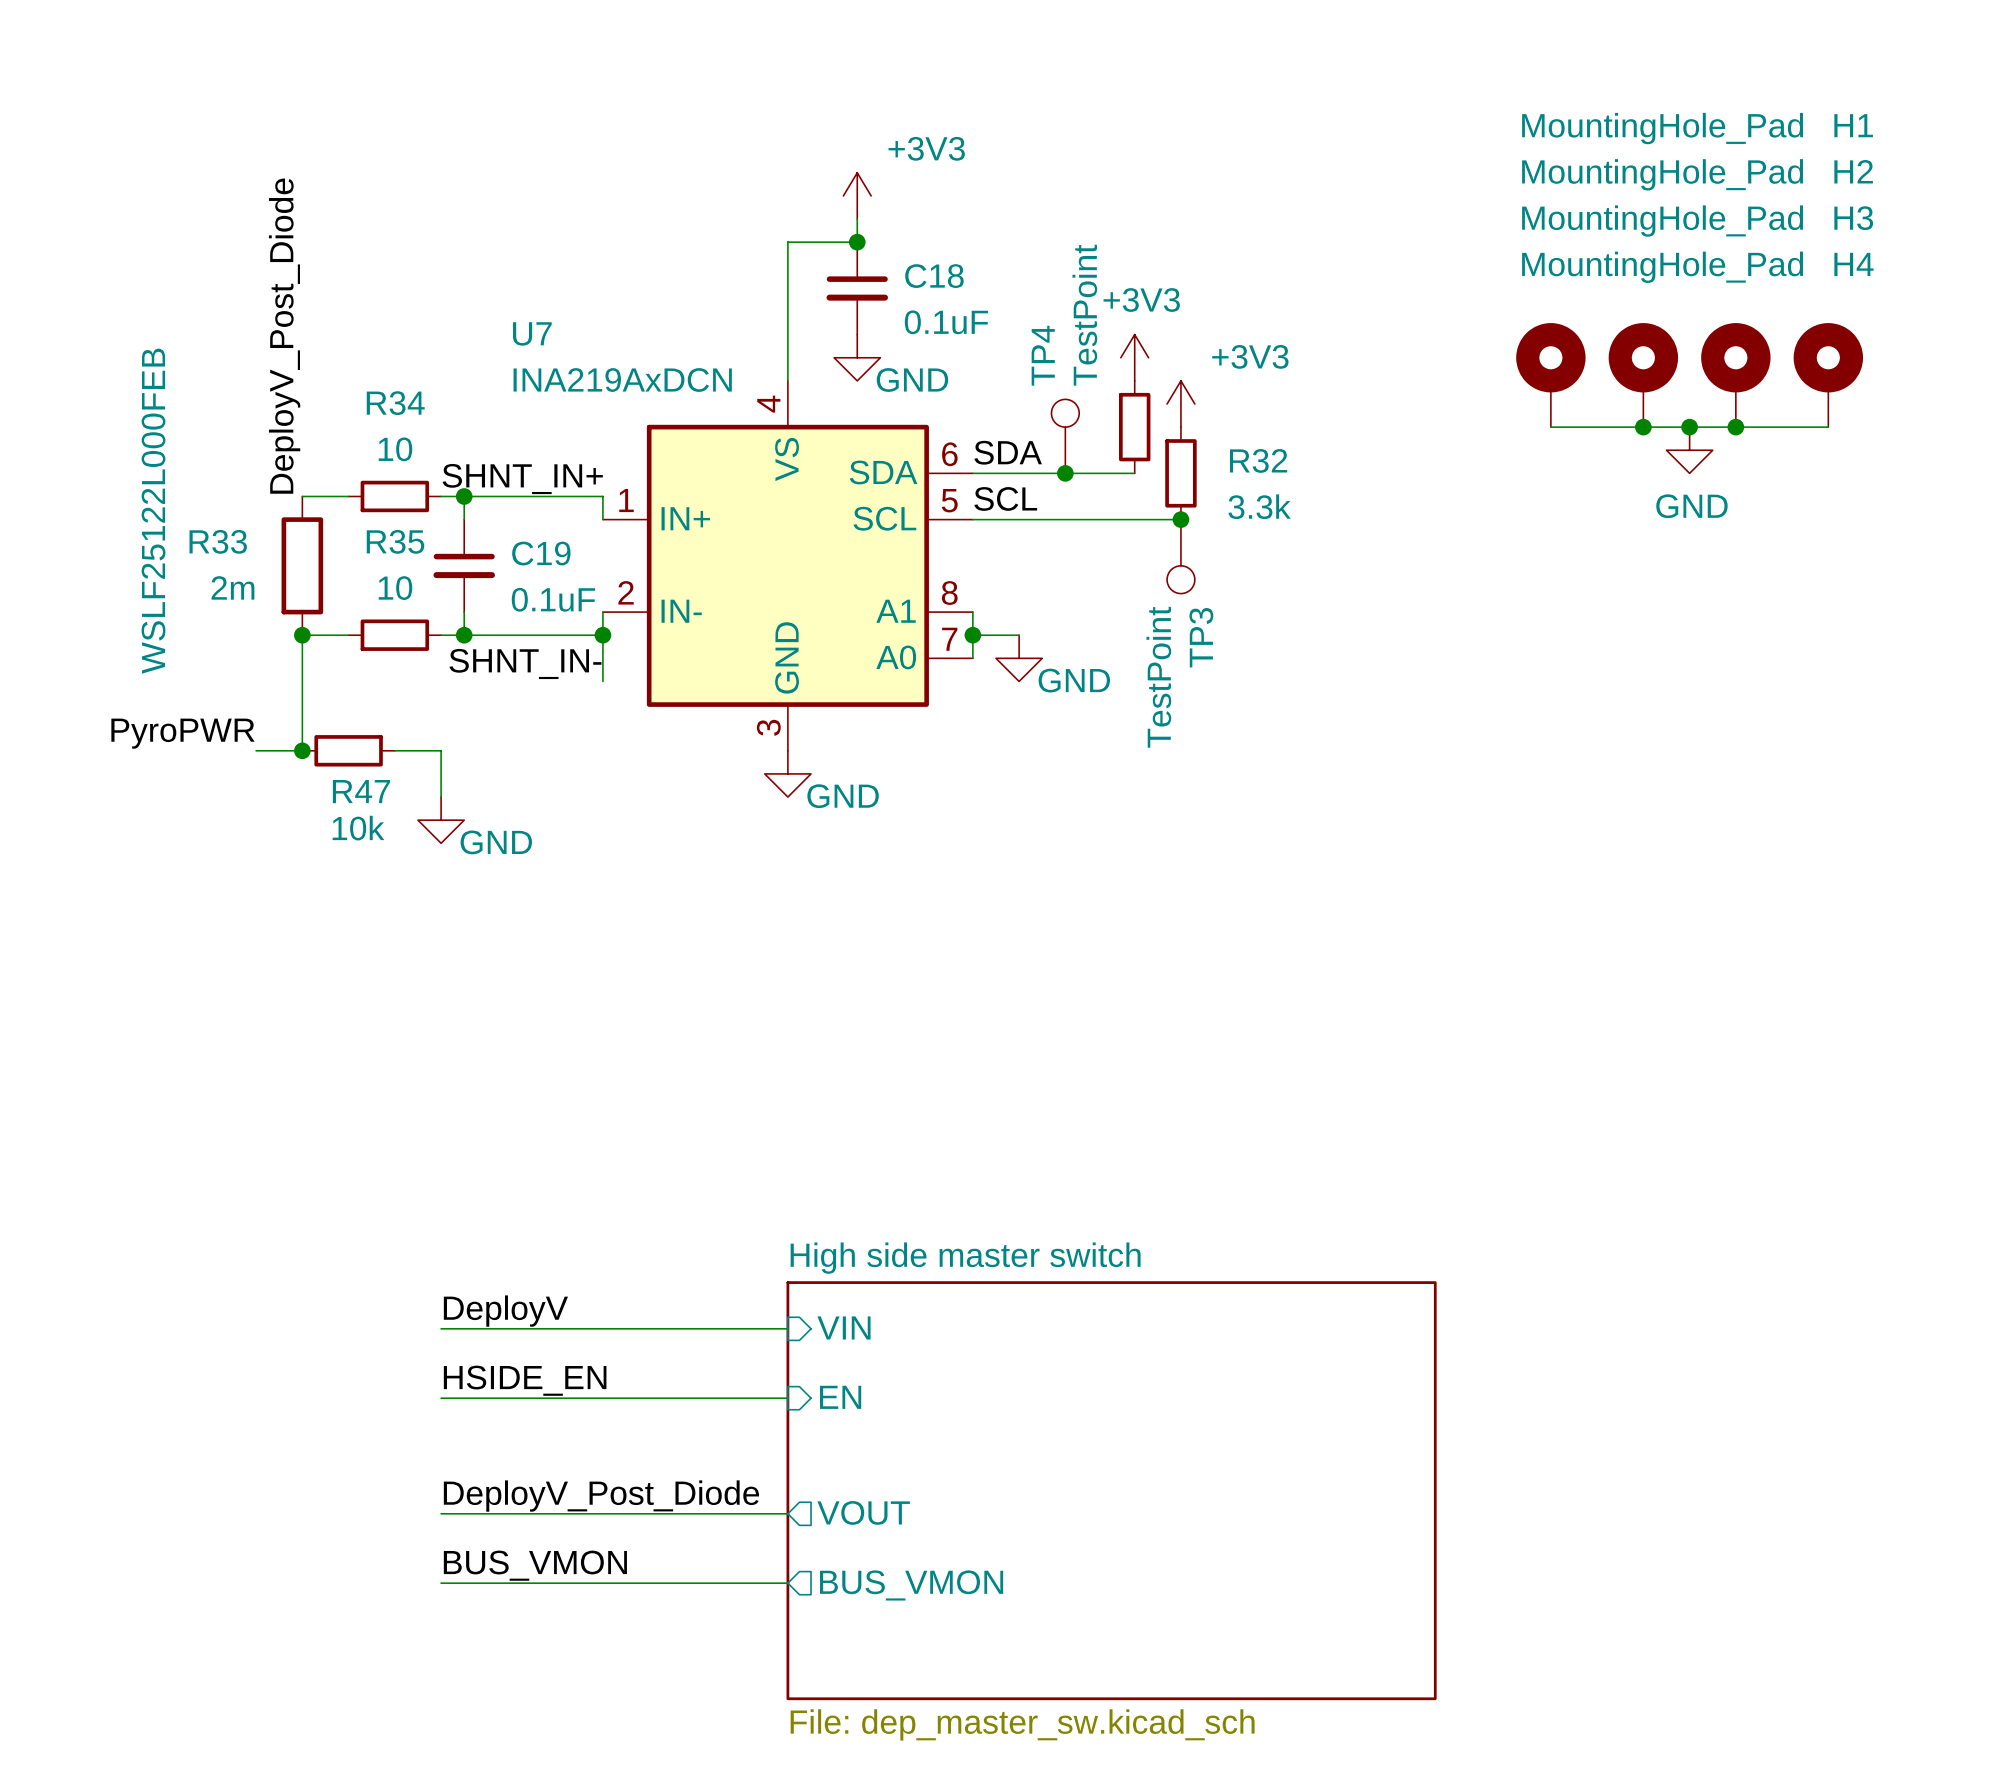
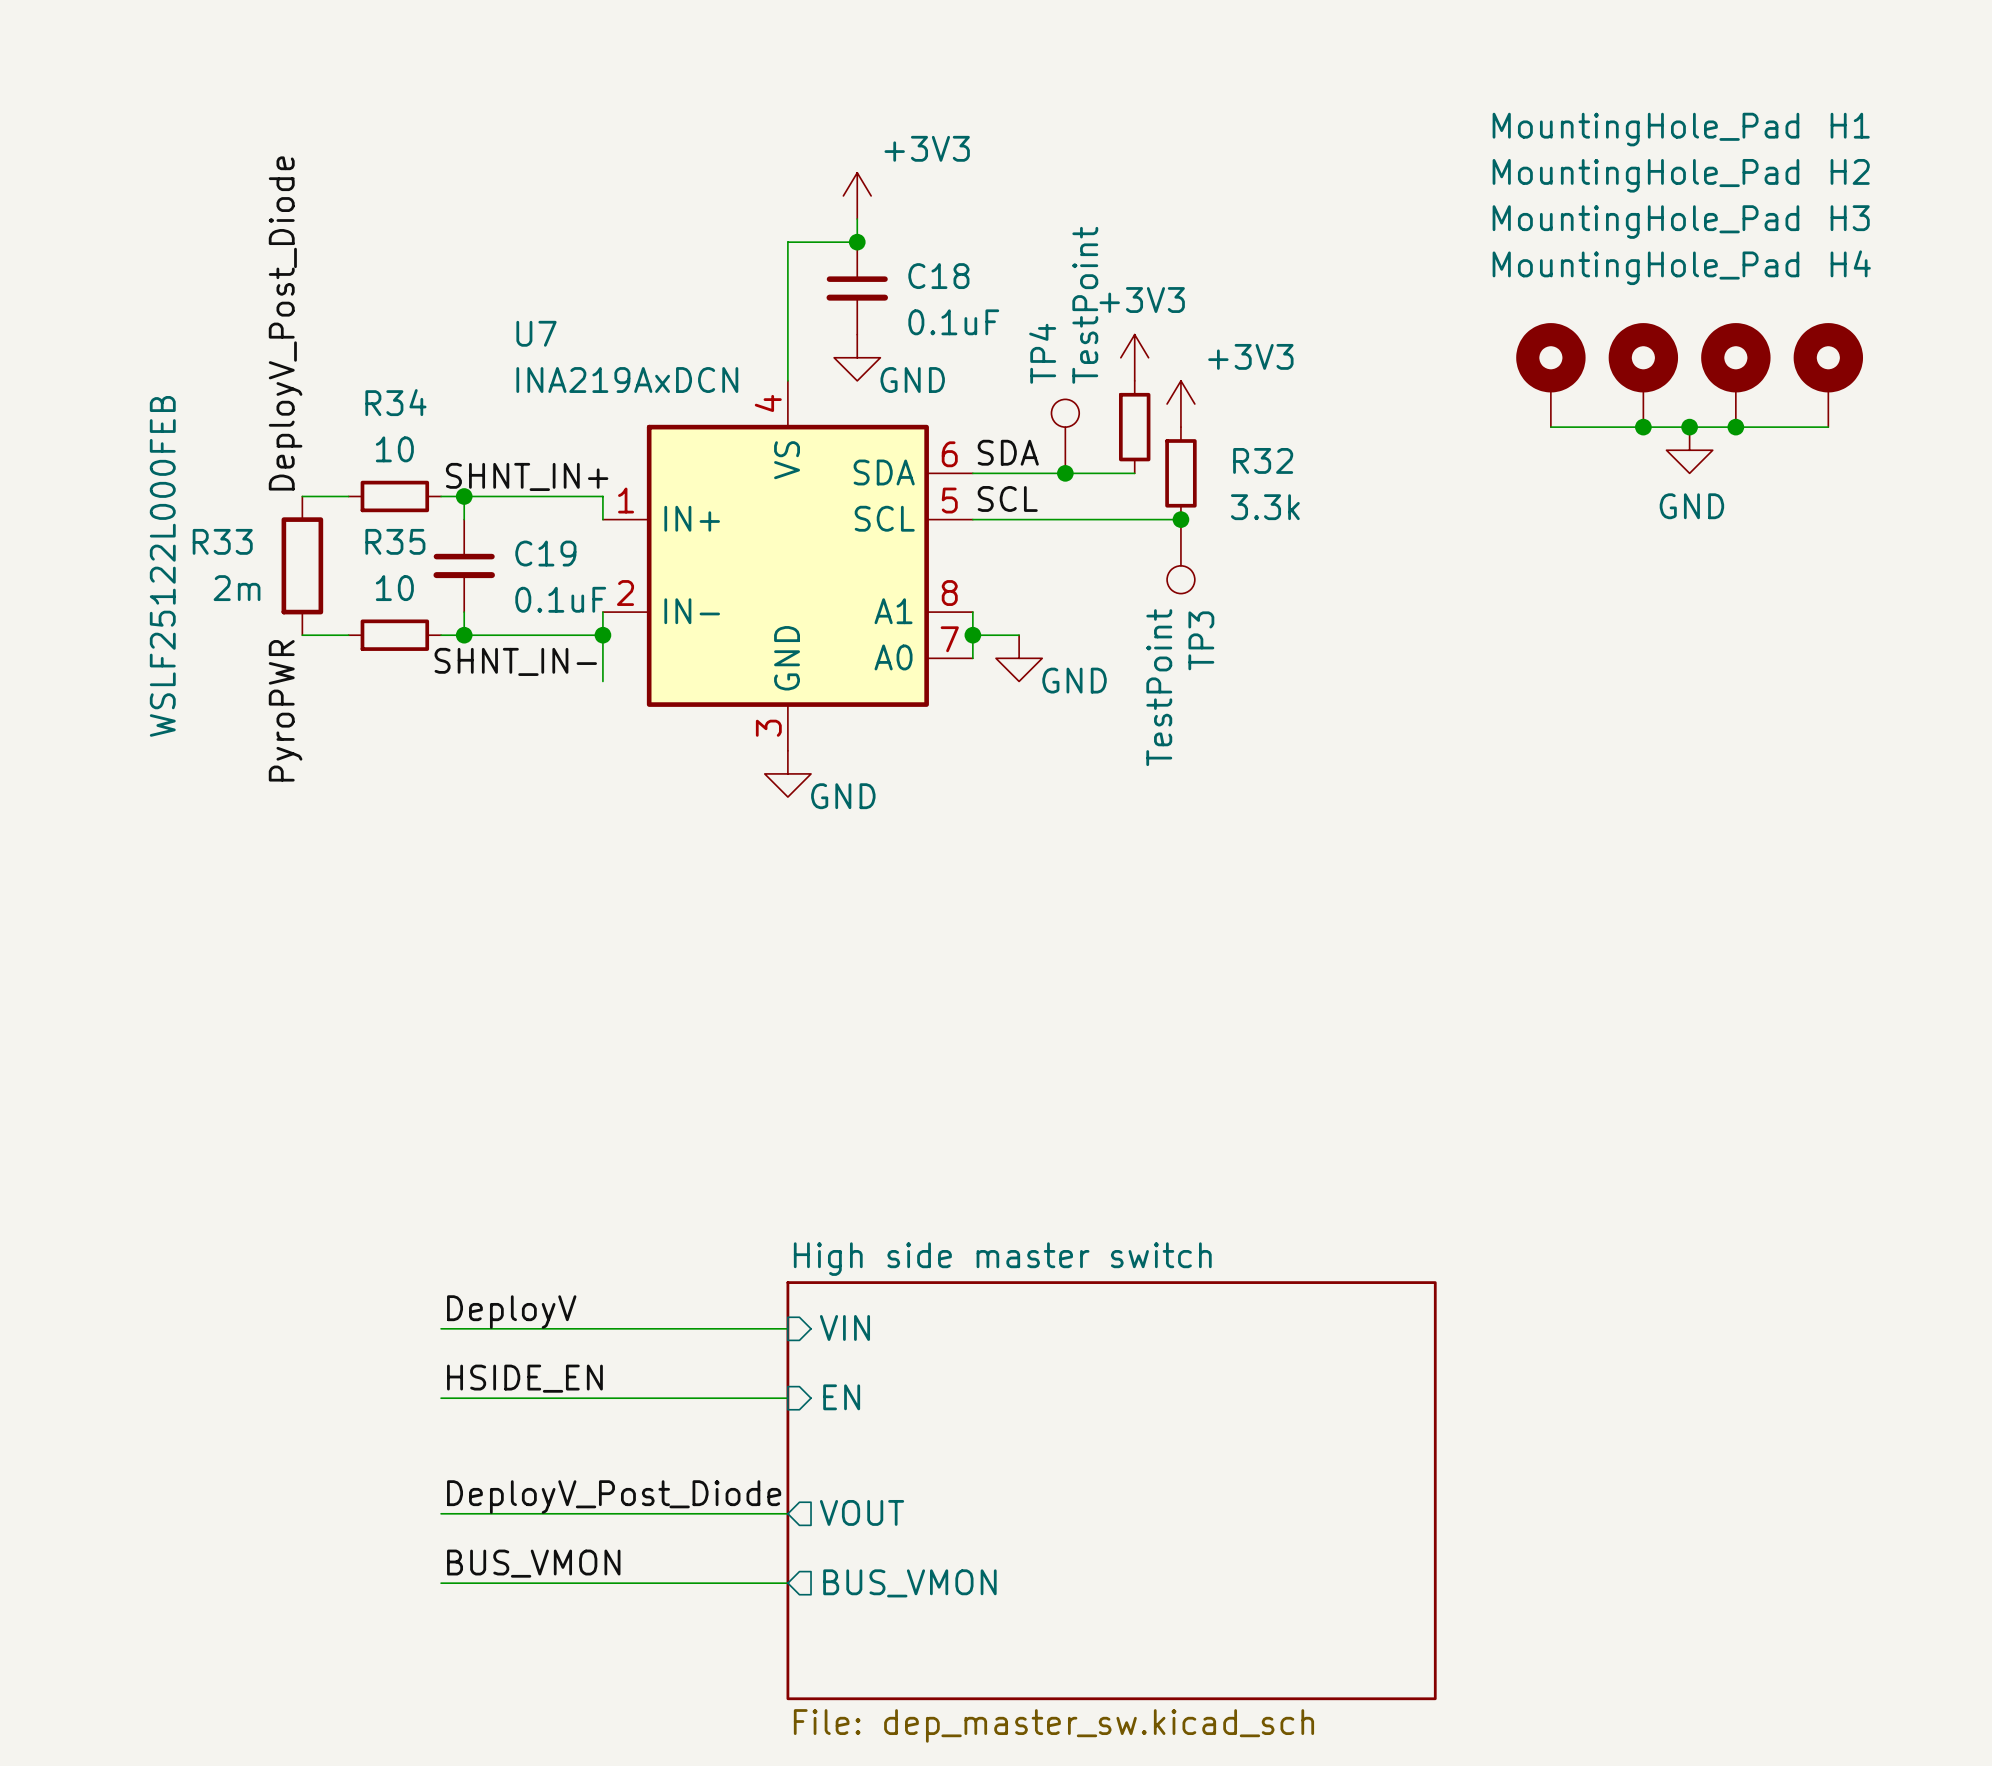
R33 text position: WSLF25122L000FEB (153, 511) -> WSLF25122L000FEB (162, 566)
wire: (302, 635) (302, 750) (256, 750) -> none
junction: (302, 635) -> none
label rotation: 0° (182, 733) -> 90° counterclockwise (285, 710)
junction: (302, 750) -> none
R47: 10k (348, 750) -> none
wire: (394, 750) (441, 750) (441, 797) -> none
power symbol: GND (441, 820) -> none

